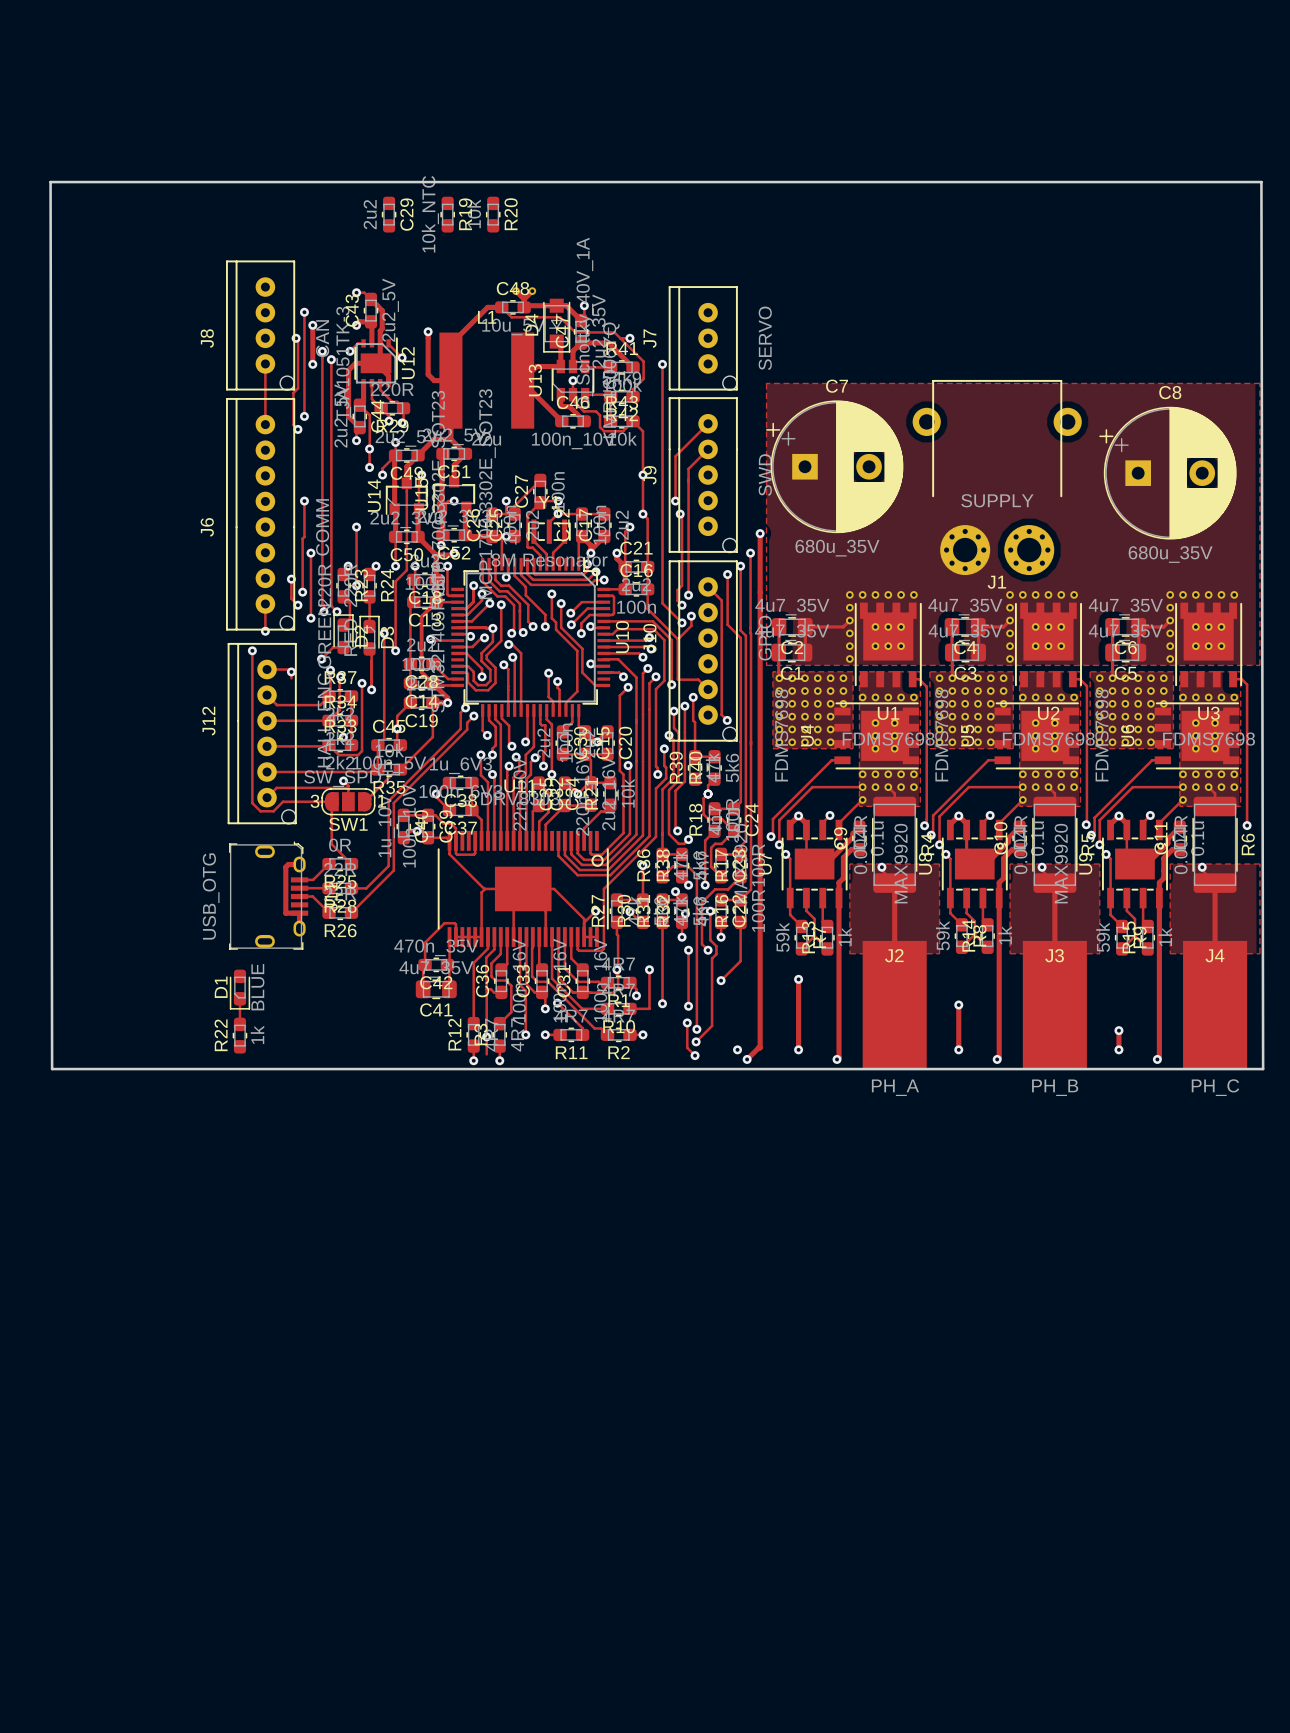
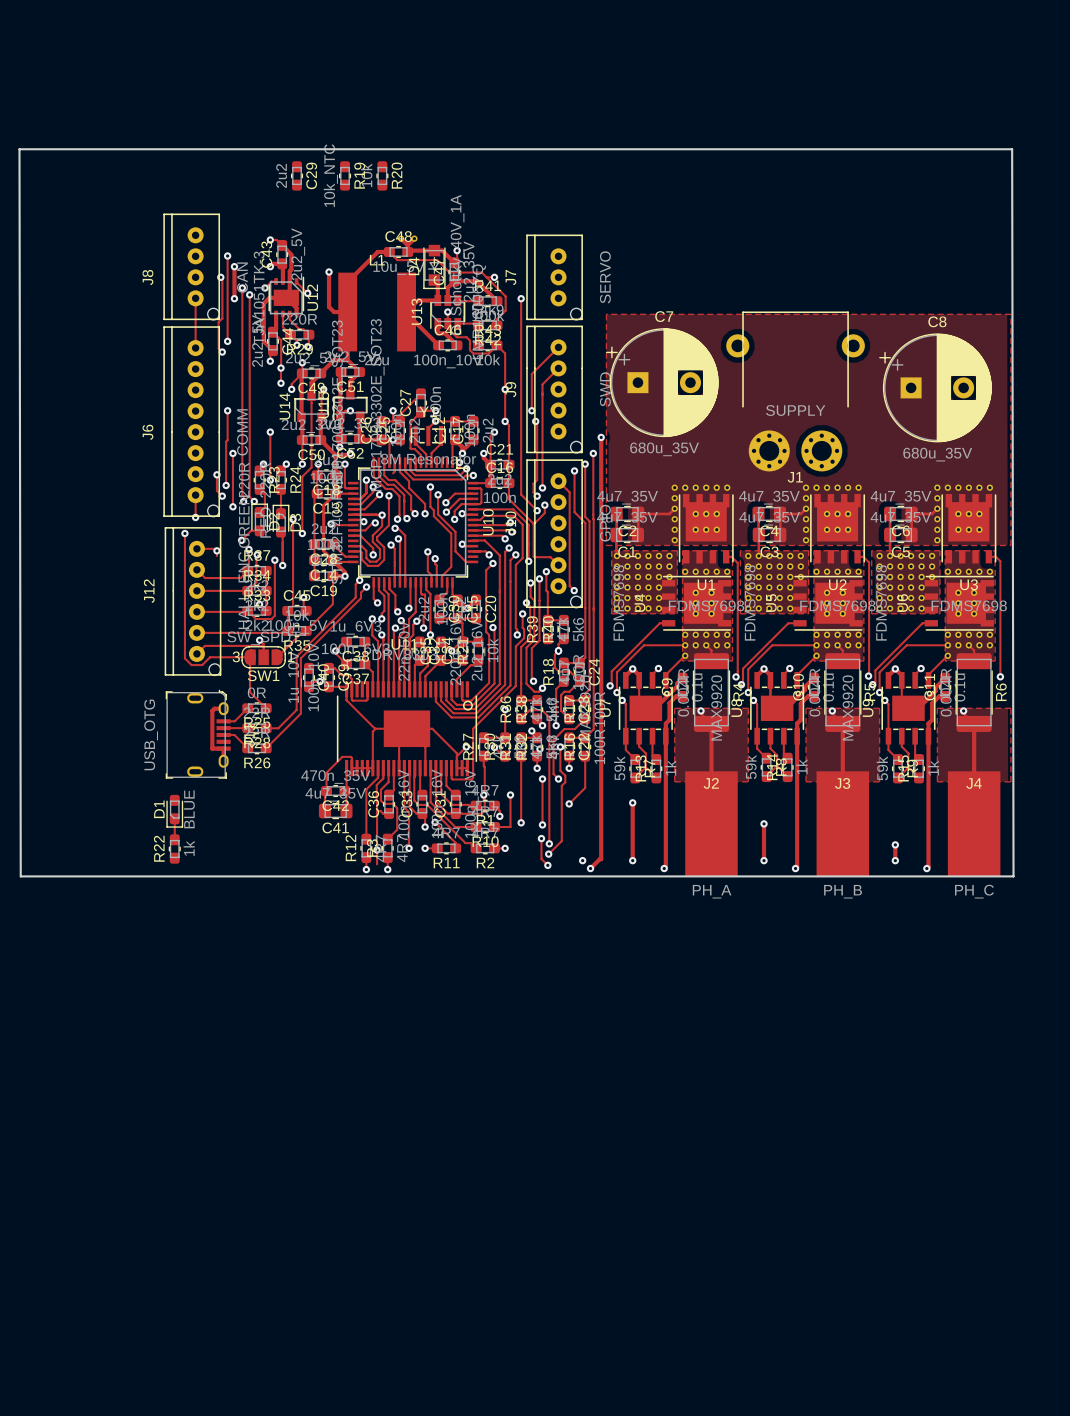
via: (506, 577) -> none
track: (410, 702) (397, 716) (397, 728) -> none
track: (403, 815) (428, 815) -> none

